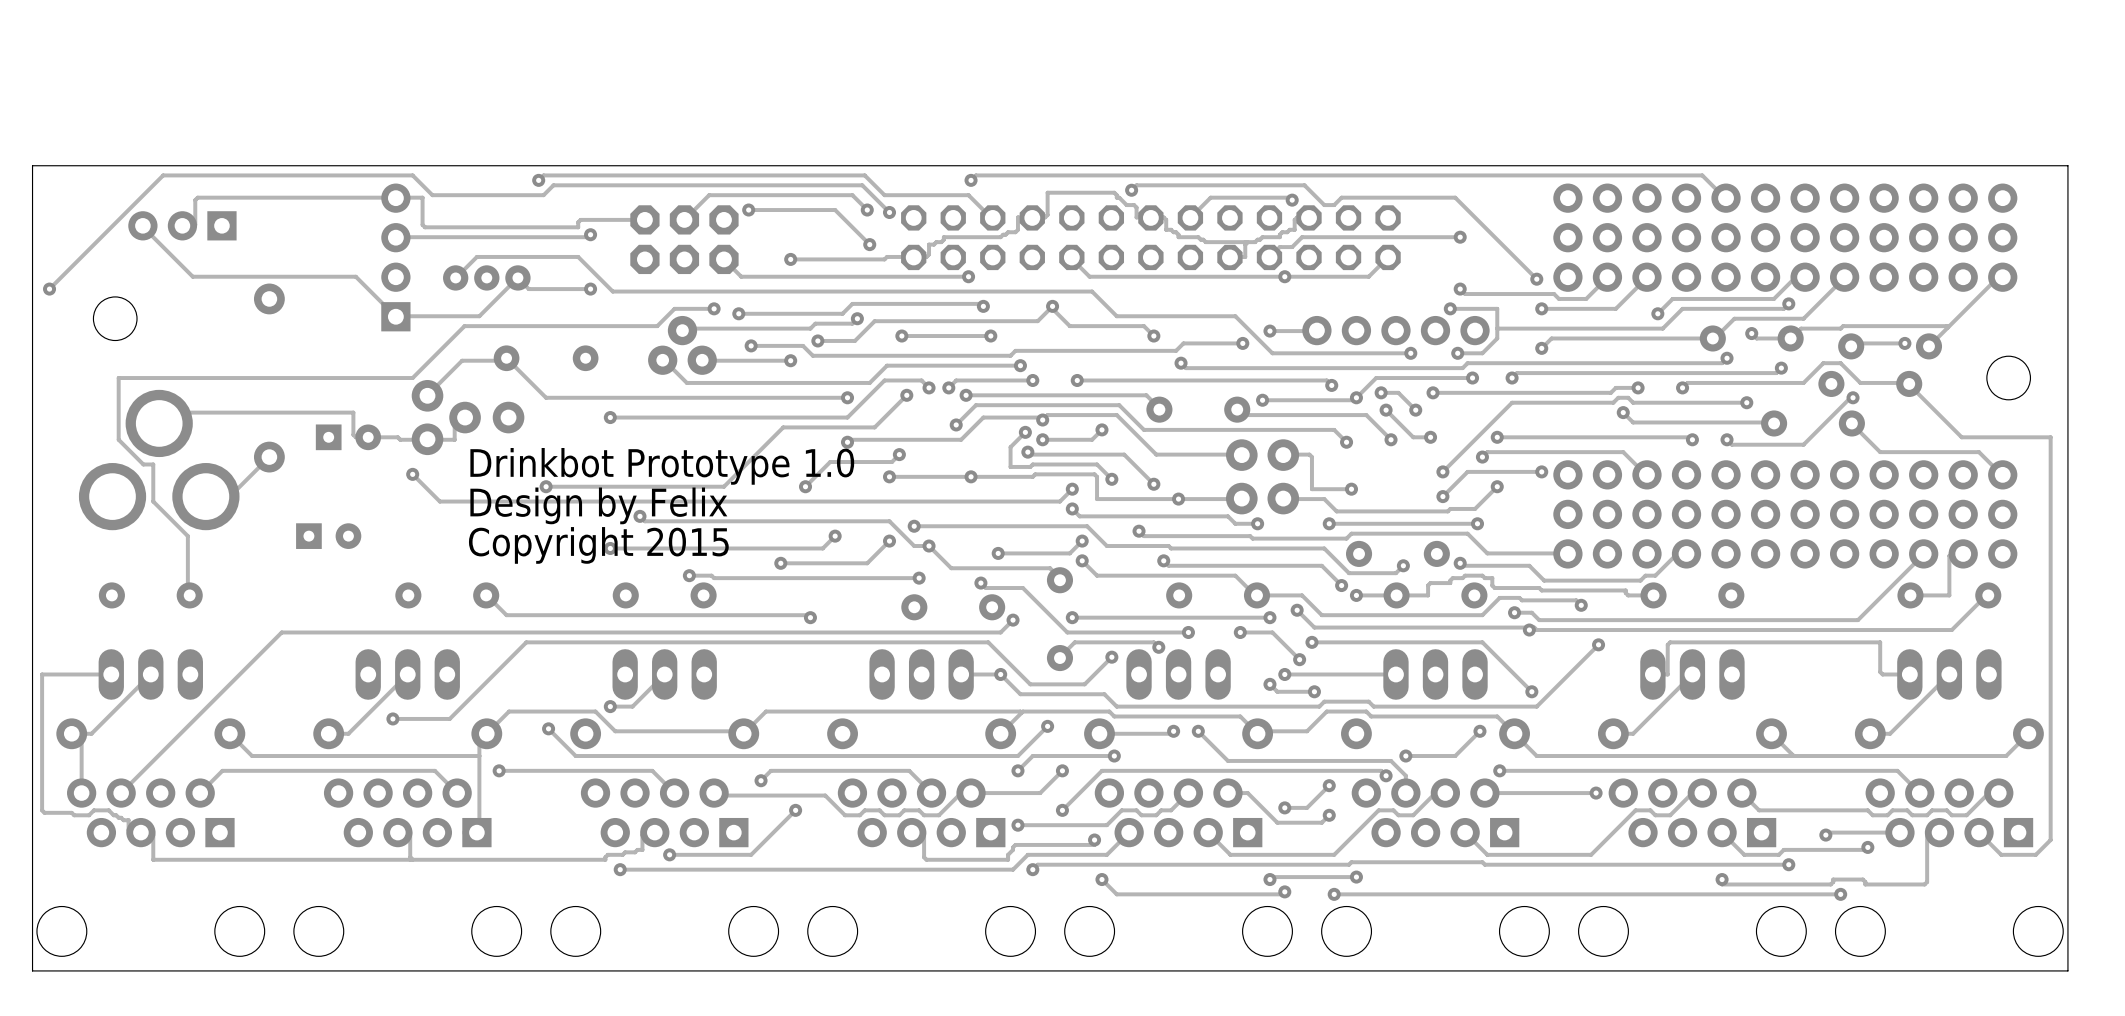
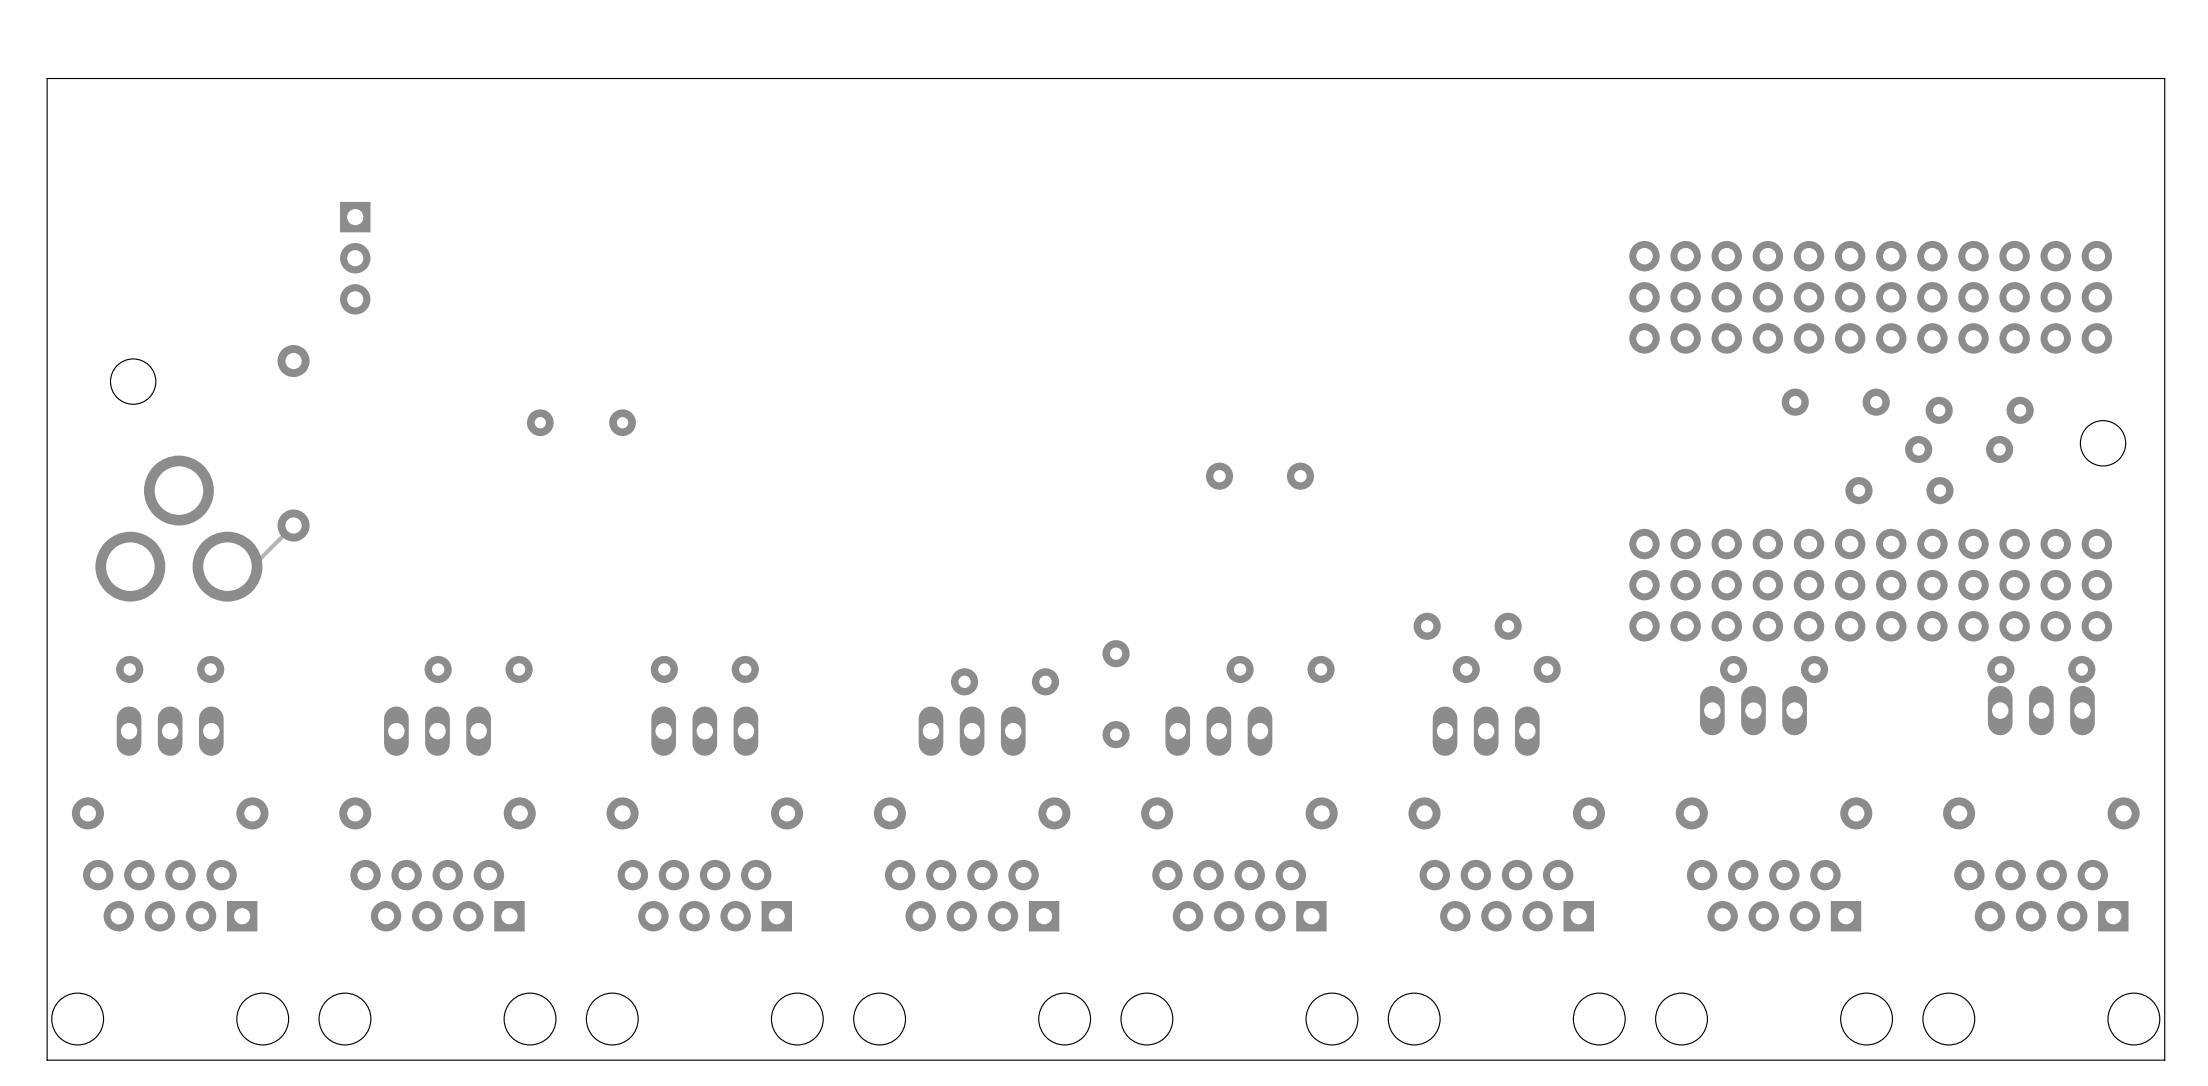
board edge: (2067, 165) (32, 165) -> (2164, 222) (2164, 78) (47, 78) (47, 222)
track: (538, 180) (543, 175) (864, 175) (884, 195) (968, 195) (992, 217) -> none
via: (538, 180) -> none
track: (971, 180) (975, 175) (1702, 175) (1726, 198) -> none
via: (971, 180) -> none
track: (1131, 190) (1136, 185) (1304, 185) (1324, 205) (1334, 205) (1341, 197) (1455, 197) (1536, 279) -> none
via: (1131, 190) -> none
track: (1292, 200) (1289, 197) (1210, 197) (1190, 217) -> none
via: (1292, 200) -> none
track: (748, 210) (835, 210) (869, 244) -> none
via: (748, 210) -> none
track: (867, 210) (852, 195) (709, 195) (684, 219) -> none
via: (867, 210) -> none
track: (889, 212) (862, 185) (553, 185) (543, 195) (432, 195) (412, 175) (163, 175) (49, 289) -> none
via: (889, 212) -> none
track: (1309, 217) (1297, 217) (1294, 219) (1294, 229) (1282, 232) (1279, 237) (1262, 237) (1255, 242) (1247, 242) (1245, 244) (1245, 256) (1229, 257) -> none
track: (644, 219) (580, 219) (578, 222) (578, 227) (425, 227) (422, 224) (422, 197) (197, 197) (195, 200) (195, 224) (182, 225) -> none
track: (142, 225) (192, 276) (355, 276) (395, 316) (479, 316) (517, 277) (528, 289) (590, 289) -> none
part rotation: 0° (182, 225) -> 90° counterclockwise (355, 258)
part position: (182, 225) -> (355, 258)
track: (590, 234) (588, 237) (395, 237) -> none
via: (590, 234) -> none
part: (1150, 237) -> none
track: (1460, 237) (1302, 237) (1292, 247) (1279, 247) (1269, 257) -> none
via: (1460, 237) -> none
part: (684, 239) -> none
track: (1246, 243) (1205, 242) (1198, 237) (1178, 237) (1176, 232) (1166, 229) (1166, 219) (1163, 217) (1136, 217) (1136, 207) (1134, 205) (1126, 205) (1116, 197) (1114, 192) (1047, 192) (1047, 214) (1045, 217) (1017, 217) (1017, 229) (1015, 232) (1008, 232) (1000, 237) (943, 237) (941, 242) (929, 244) (929, 254) (926, 256) (887, 256) (884, 259) (790, 259) -> none
via: (869, 244) -> none
part: (395, 257) -> none
track: (1388, 257) (1368, 276) (1089, 276) (1071, 257) -> none
track: (723, 259) (741, 276) (968, 276) -> none
via: (790, 259) -> none
via: (968, 276) -> none
via: (1284, 276) -> none
track: (455, 277) (476, 256) (578, 256) (612, 291) (1092, 291) (1116, 316) (1235, 316) (1272, 353) (1410, 353) -> none
part: (486, 277) -> none
track: (1607, 277) (1586, 298) (1559, 298) (1554, 294) (1465, 294) (1460, 289) -> none
track: (1646, 277) (1615, 308) (1541, 308) -> none
track: (1805, 277) (1803, 279) (1793, 279) (1773, 298) (1672, 298) (1657, 313) -> none
track: (1844, 277) (1803, 318) (1734, 318) (1714, 338) (1551, 338) (1541, 348) -> none
track: (2002, 277) (1996, 279) (1928, 346) -> none
via: (1536, 279) -> none
via: (49, 289) -> none
via: (590, 289) -> none
via: (1460, 289) -> none
track: (1788, 303) (1783, 308) (1682, 308) (1662, 328) (1497, 328) -> none
via: (1788, 303) -> none
track: (983, 306) (980, 303) (852, 303) (842, 313) (738, 313) -> none
via: (983, 306) -> none
via: (1052, 306) -> none
track: (714, 308) (674, 308) (657, 326) (464, 326) (412, 378) (118, 378) (118, 439) (143, 464) (153, 464) (153, 501) (187, 536) (187, 595) (189, 595) -> none
via: (714, 308) -> none
track: (1450, 308) (1497, 308) (1497, 338) (1482, 353) (1457, 353) -> none
via: (1450, 308) -> none
via: (1541, 308) -> none
via: (738, 313) -> none
via: (1657, 313) -> none
track: (857, 318) (852, 323) (815, 323) (810, 328) (684, 328) (682, 330) -> none
via: (857, 318) -> none
track: (1948, 327) (1843, 326) (1840, 328) (1801, 328) (1791, 338) (1756, 338) (1751, 333) -> none
track: (1316, 330) (1269, 331) -> none
part: (1395, 330) -> none
via: (1269, 331) -> none
via: (1751, 333) -> none
via: (901, 336) -> none
track: (990, 336) (901, 336) -> none
via: (990, 336) -> none
track: (1153, 336) (1143, 326) (1069, 326) (1052, 308) (1052, 306) (1037, 321) (874, 321) (854, 340) (817, 340) -> none
via: (1153, 336) -> none
via: (817, 340) -> none
track: (1242, 343) (1183, 343) (1176, 350) (1015, 350) (1010, 355) (812, 355) (803, 345) (751, 345) -> none
via: (1242, 343) -> none
track: (1904, 343) (1855, 343) (1851, 346) -> none
via: (1904, 343) -> none
part: (682, 345) -> none
via: (751, 345) -> none
via: (1541, 348) -> none
via: (1410, 353) -> none
via: (1457, 353) -> none
track: (1727, 358) (1722, 363) (1467, 363) (1462, 368) (1185, 368) (1181, 363) -> none
via: (1727, 358) -> none
track: (662, 360) (686, 382) (869, 382) (887, 365) (1020, 365) -> none
track: (702, 360) (790, 360) -> none
via: (790, 360) -> none
via: (1181, 363) -> none
via: (1020, 365) -> none
track: (1781, 368) (1776, 373) (1517, 373) (1512, 378) -> none
via: (1781, 368) -> none
track: (1472, 378) (1376, 378) (1353, 400) (1262, 400) -> none
via: (1472, 378) -> none
via: (1512, 378) -> none
track: (1032, 380) (956, 380) (948, 387) -> none
via: (1032, 380) -> none
track: (1077, 380) (1326, 380) (1331, 385) -> none
via: (1077, 380) -> none
via: (1331, 385) -> none
track: (929, 387) (921, 380) (884, 380) (847, 417) (610, 417) -> none
via: (929, 387) -> none
via: (948, 387) -> none
track: (1638, 387) (1615, 387) (1610, 392) (1433, 392) -> none
via: (1638, 387) -> none
track: (1682, 387) (1687, 382) (1803, 382) (1823, 363) (1840, 363) (1860, 382) (1909, 383) (1961, 437) (2050, 437) (2050, 840) (2035, 854) (2001, 854) (1979, 832) -> none
via: (1682, 387) -> none
track: (1381, 392) (1398, 392) (1415, 410) -> none
via: (1381, 392) -> none
via: (1433, 392) -> none
track: (427, 395) (462, 360) (506, 360) (506, 358) (546, 397) (847, 397) -> none
track: (906, 395) (874, 427) (783, 427) (723, 486) (546, 486) -> none
via: (906, 395) -> none
track: (966, 395) (1146, 395) (1159, 409) -> none
via: (966, 395) -> none
via: (847, 397) -> none
via: (1356, 397) -> none
track: (1853, 397) (1850, 397) (1803, 444) (1731, 444) (1727, 439) -> none
via: (1853, 397) -> none
via: (1262, 400) -> none
track: (1746, 402) (1633, 402) (1628, 397) (1618, 397) (1613, 402) (1512, 402) (1442, 471) -> none
via: (1746, 402) -> none
track: (1237, 409) (1242, 415) (1366, 415) (1391, 439) -> none
track: (1386, 410) (1413, 437) (1430, 437) -> none
via: (1386, 410) -> none
via: (1415, 410) -> none
track: (1623, 412) (1633, 422) (1774, 423) -> none
via: (1623, 412) -> none
part: (427, 417) -> none
track: (465, 417) (457, 417) (454, 420) (454, 439) (355, 437) (353, 434) (353, 412) (187, 412) (185, 415) (185, 422) (159, 423) -> none
part: (486, 417) -> none
via: (610, 417) -> none
via: (1042, 420) -> none
track: (1851, 423) (1880, 452) (1979, 452) (2002, 474) -> none
track: (956, 424) (975, 405) (1119, 405) (1143, 429) (1334, 429) (1346, 442) -> none
via: (956, 424) -> none
track: (1101, 429) (1092, 439) (1042, 439) -> none
via: (1101, 429) -> none
track: (1025, 432) (1010, 447) (1010, 466) (1030, 466) (1032, 464) (1097, 464) (1111, 479) -> none
via: (1025, 432) -> none
part: (348, 437) -> none
via: (1430, 437) -> none
track: (1497, 437) (1689, 437) (1692, 439) -> none
via: (1497, 437) -> none
via: (1042, 439) -> none
via: (1391, 439) -> none
via: (1692, 439) -> none
via: (1727, 439) -> none
track: (847, 442) (849, 439) (961, 439) (983, 417) (1042, 417) (1042, 420) (1047, 415) (1116, 415) (1156, 454) (1241, 455) -> none
via: (847, 442) -> none
via: (1346, 442) -> none
track: (1027, 452) (1030, 454) (1124, 454) (1153, 484) -> none
via: (1027, 452) -> none
track: (899, 454) (891, 462) (830, 462) (805, 486) -> none
via: (899, 454) -> none
track: (1283, 455) (1309, 454) (1311, 457) (1311, 489) (1351, 489) -> none
track: (1482, 457) (1487, 452) (1623, 452) (1646, 474) -> none
via: (1482, 457) -> none
text: Drinkbot Prototype 1.0 (662, 466) -> none
via: (1442, 471) -> none
track: (1541, 471) (1467, 471) (1442, 496) -> none
via: (1541, 471) -> none
track: (412, 474) (439, 501) (1059, 501) (1072, 489) -> none
via: (412, 474) -> none
track: (889, 476) (1032, 476) (1035, 474) (1094, 474) (1097, 476) (1097, 499) (1241, 498) -> none
via: (889, 476) -> none
via: (971, 476) -> none
part: (1241, 476) -> none
part: (1283, 476) -> none
via: (1111, 479) -> none
via: (1153, 484) -> none
via: (546, 486) -> none
via: (805, 486) -> none
track: (1497, 486) (1475, 508) (1450, 508) (1447, 511) (1336, 511) (1324, 499) (1283, 498) -> none
via: (1497, 486) -> none
via: (1072, 489) -> none
via: (1351, 489) -> none
via: (1442, 496) -> none
via: (1178, 499) -> none
text: Design by Felix (598, 505) -> none
track: (1072, 508) (1079, 516) (1227, 516) (1235, 523) (1257, 523) -> none
via: (1072, 508) -> none
track: (639, 516) (644, 521) (889, 521) (914, 546) (929, 546) (951, 568) (1050, 568) (1059, 580) -> none
via: (639, 516) -> none
via: (1257, 523) -> none
via: (1329, 523) -> none
track: (1477, 523) (1329, 523) -> none
via: (1477, 523) -> none
track: (914, 526) (1087, 526) (1106, 546) (1168, 546) (1171, 548) (1324, 548) (1349, 573) (1395, 573) (1403, 565) -> none
via: (914, 526) -> none
track: (1139, 531) (1143, 536) (1250, 536) (1252, 538) (1346, 538) (1351, 533) (1467, 533) (1487, 553) (1567, 553) -> none
via: (1139, 531) -> none
part: (328, 536) -> none
track: (835, 536) (822, 548) (610, 548) -> none
via: (835, 536) -> none
track: (889, 541) (867, 563) (780, 563) -> none
via: (889, 541) -> none
track: (1082, 541) (1069, 553) (998, 553) -> none
via: (1082, 541) -> none
text: Copyright 2015 (598, 545) -> none
via: (929, 546) -> none
via: (610, 548) -> none
via: (998, 553) -> none
track: (1686, 553) (1677, 553) (1655, 575) (1645, 575) (1640, 580) (1544, 580) (1529, 565) (1462, 565) (1460, 563) -> none
track: (1923, 553) (1857, 620) (1539, 620) (1531, 612) (1514, 612) -> none
track: (1963, 553) (1951, 553) (1949, 555) (1949, 595) (1910, 595) -> none
track: (1082, 560) (1097, 575) (1235, 575) (1255, 595) (1302, 595) (1321, 615) (1482, 615) (1499, 597) (1519, 597) (1521, 600) (1576, 600) (1581, 605) -> none
via: (1082, 560) -> none
track: (1163, 560) (1168, 565) (1321, 565) (1341, 585) -> none
via: (1163, 560) -> none
via: (780, 563) -> none
via: (1460, 563) -> none
via: (1403, 565) -> none
track: (689, 575) (711, 575) (714, 578) (919, 578) -> none
via: (689, 575) -> none
via: (919, 578) -> none
track: (980, 583) (985, 588) (1022, 588) (1067, 632) (1188, 632) -> none
via: (980, 583) -> none
via: (1341, 585) -> none
track: (486, 595) (506, 615) (807, 615) (810, 617) -> none
via: (1356, 595) -> none
track: (1653, 595) (1628, 595) (1625, 590) (1541, 590) (1539, 588) (1494, 588) (1492, 585) (1492, 578) (1484, 578) (1482, 575) (1452, 578) (1450, 583) (1430, 583) (1428, 585) (1428, 595) (1356, 595) -> none
track: (1988, 595) (1951, 630) (1536, 630) (1534, 627) (1314, 627) (1297, 610) -> none
via: (1581, 605) -> none
via: (1297, 610) -> none
via: (1514, 612) -> none
via: (810, 617) -> none
via: (1072, 617) -> none
track: (1269, 617) (1072, 617) -> none
via: (1269, 617) -> none
track: (1013, 620) (1000, 632) (281, 632) (121, 793) -> none
via: (1013, 620) -> none
via: (1529, 630) -> none
via: (1188, 632) -> none
track: (1240, 632) (1272, 632) (1299, 659) -> none
via: (1240, 632) -> none
part: none -> (1753, 710)
part: none -> (2041, 710)
track: (1311, 642) (1482, 642) (1531, 691) -> none
via: (1311, 642) -> none
track: (1598, 644) (1536, 706) (1373, 706) (1368, 701) (1324, 701) (1319, 706) (1116, 706) (1104, 694) (1020, 694) (1000, 674) (961, 674) -> none
via: (1598, 644) -> none
track: (1158, 647) (1153, 642) (1074, 642) (1059, 658) -> none
via: (1158, 647) -> none
part: none -> (170, 731)
part: none -> (437, 731)
part: none -> (704, 731)
part: none -> (972, 731)
part: none -> (1218, 731)
part: none -> (1486, 731)
track: (1111, 657) (1084, 684) (1030, 684) (988, 642) (526, 642) (449, 718) (392, 718) -> none
via: (1111, 657) -> none
via: (1299, 659) -> none
track: (111, 674) (42, 674) (42, 810) (44, 812) (71, 812) (74, 815) (89, 815) (93, 810) (108, 810) (113, 815) (123, 820) (128, 820) (128, 830) (131, 832) (150, 832) (153, 835) (153, 859) (411, 858) -> none
track: (150, 674) (91, 733) (71, 733) -> none
part: (150, 674) -> none
track: (407, 674) (348, 733) (328, 733) -> none
part: (407, 674) -> none
track: (664, 674) (632, 706) (610, 706) -> none
part: (664, 674) -> none
part: (921, 674) -> none
via: (1000, 674) -> none
part: (1178, 674) -> none
via: (1284, 674) -> none
track: (1395, 674) (1284, 674) -> none
part: (1435, 674) -> none
track: (1692, 674) (1633, 733) (1613, 733) -> none
part: (1692, 674) -> none
track: (1909, 674) (1882, 674) (1880, 672) (1880, 642) (1670, 642) (1667, 644) (1667, 674) (1652, 674) -> none
track: (1949, 674) (1890, 733) (1870, 733) -> none
part: (1949, 674) -> none
track: (1269, 684) (1277, 691) (1314, 691) -> none
via: (1269, 684) -> none
via: (1314, 691) -> none
via: (1531, 691) -> none
via: (610, 706) -> none
track: (1021, 712) (765, 711) (743, 733) (743, 731) (615, 731) (595, 711) (509, 711) (486, 733) (479, 733) (479, 830) (476, 832) (467, 832) -> none
via: (392, 718) -> none
track: (1047, 726) (1017, 756) (575, 756) (548, 728) -> none
via: (1047, 726) -> none
via: (548, 728) -> none
track: (1173, 731) (1171, 733) (1099, 733) -> none
via: (1173, 731) -> none
track: (1198, 731) (1227, 760) (1391, 760) (1405, 775) (1405, 793) -> none
via: (1198, 731) -> none
track: (1479, 731) (1455, 756) (1405, 756) -> none
via: (1479, 731) -> none
track: (81, 733) (81, 793) -> none
track: (229, 733) (252, 756) (479, 756) -> none
track: (1000, 733) (1022, 711) (1109, 711) (1114, 716) (1240, 716) (1257, 733) (1257, 731) (1307, 731) (1326, 711) (1366, 711) (1371, 716) (1497, 716) (1536, 756) (1792, 754) -> none
track: (2028, 733) (2006, 756) (1793, 756) (1771, 733) -> none
track: (1114, 756) (1032, 756) (1017, 770) -> none
via: (1114, 756) -> none
via: (1405, 756) -> none
track: (499, 770) (652, 770) (674, 793) -> none
via: (499, 770) -> none
via: (1017, 770) -> none
track: (1062, 770) (1040, 793) (961, 793) (938, 815) (924, 815) (919, 810) (904, 810) (899, 815) (884, 815) (879, 810) (864, 810) (859, 815) (845, 815) (825, 795) (716, 795) (714, 793) -> none
via: (1062, 770) -> none
track: (1499, 770) (1897, 770) (1919, 793) -> none
via: (1499, 770) -> none
track: (1386, 775) (1381, 770) (1101, 770) (1062, 810) -> none
via: (1386, 775) -> none
track: (761, 780) (770, 770) (909, 770) (931, 793) -> none
via: (761, 780) -> none
track: (1329, 785) (1307, 807) (1284, 807) -> none
via: (1329, 785) -> none
track: (457, 793) (434, 770) (222, 770) (200, 793) -> none
track: (1188, 793) (1171, 810) (1161, 810) (1156, 815) (1141, 815) (1136, 810) (1121, 810) (1106, 825) (1017, 825) -> none
track: (1227, 793) (1247, 793) (1277, 822) (1321, 822) (1329, 815) -> none
track: (1445, 793) (1435, 793) (1413, 815) (1398, 815) (1393, 810) (1378, 810) (1334, 854) (1230, 854) (1208, 832) -> none
track: (1596, 793) (1484, 793) -> none
via: (1596, 793) -> none
track: (1702, 793) (1692, 793) (1670, 815) (1655, 815) (1650, 810) (1635, 810) (1591, 854) (1487, 854) (1465, 832) -> none
track: (1998, 793) (1988, 793) (1966, 815) (1951, 815) (1946, 810) (1932, 810) (1927, 815) (1912, 815) (1907, 810) (1892, 810) (1887, 815) (1872, 815) (1867, 810) (1759, 810) (1741, 793) -> none
via: (1284, 807) -> none
track: (795, 810) (751, 854) (669, 854) -> none
via: (795, 810) -> none
via: (1062, 810) -> none
via: (1329, 815) -> none
via: (1017, 825) -> none
track: (654, 832) (644, 832) (642, 835) (642, 849) (625, 852) (622, 854) (607, 854) (605, 859) (412, 859) (410, 857) (410, 832) (397, 832) -> none
track: (911, 832) (924, 832) (924, 857) (926, 859) (1008, 859) (1008, 854) (1015, 844) (1094, 844) (1094, 840) -> none
track: (1129, 832) (1106, 854) (1027, 854) (1013, 869) (620, 869) -> none
track: (1722, 832) (1744, 854) (1778, 854) (1783, 849) (1865, 849) (1867, 847) -> none
track: (1899, 832) (1828, 832) (1825, 835) -> none
track: (1939, 832) (1927, 832) (1927, 882) (1924, 884) (1865, 884) (1862, 879) (1833, 879) (1830, 884) (1722, 884) (1722, 879) -> none
via: (1825, 835) -> none
via: (1094, 840) -> none
via: (1867, 847) -> none
via: (669, 854) -> none
track: (1788, 864) (1484, 864) (1482, 862) (1351, 862) (1349, 864) (1037, 864) (1032, 869) -> none
via: (1788, 864) -> none
via: (620, 869) -> none
via: (1032, 869) -> none
track: (1356, 877) (1272, 877) (1269, 879) -> none
via: (1356, 877) -> none
track: (1101, 879) (1116, 894) (1282, 894) (1284, 891) -> none
via: (1101, 879) -> none
via: (1269, 879) -> none
via: (1722, 879) -> none
via: (1284, 891) -> none
via: (1334, 894) -> none
track: (1840, 894) (1334, 894) -> none
via: (1840, 894) -> none

